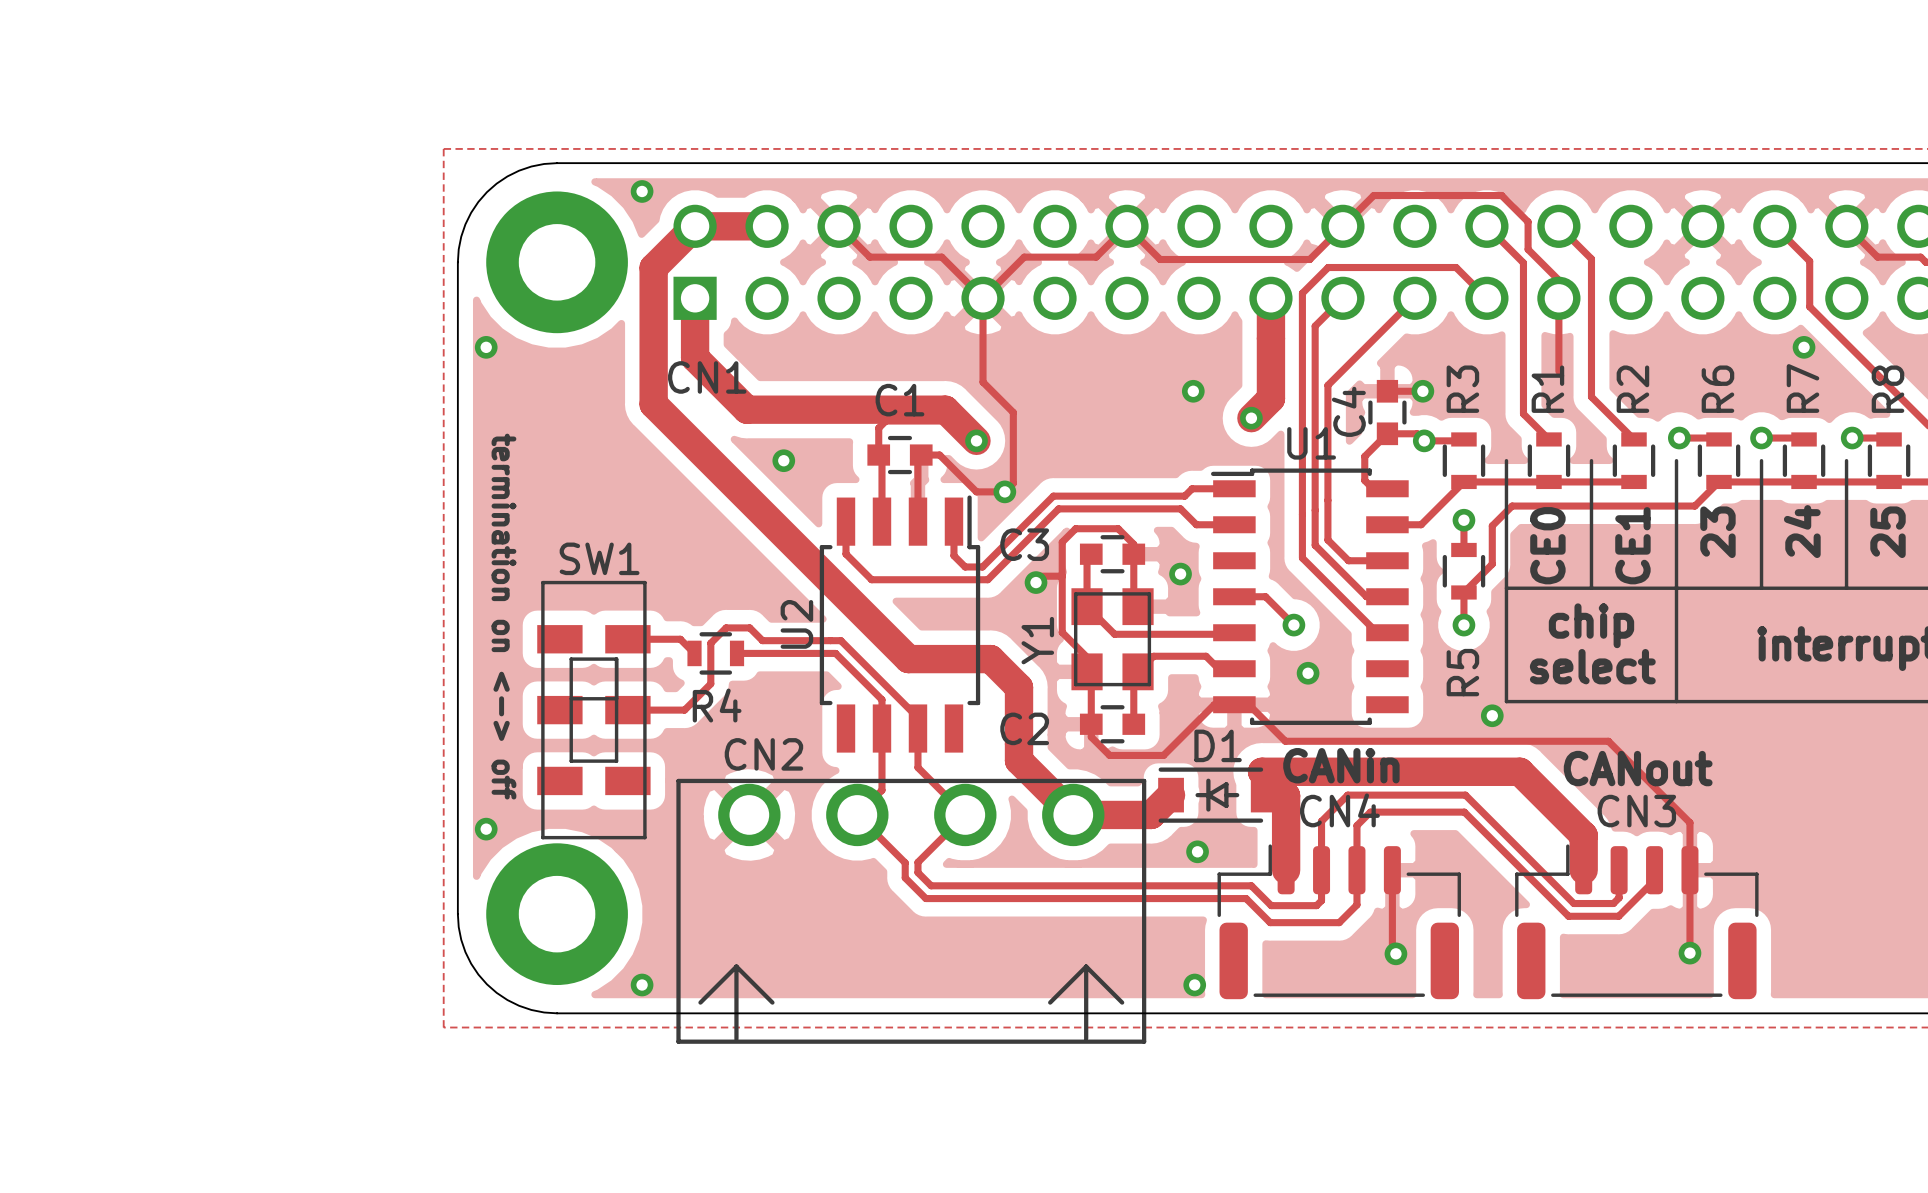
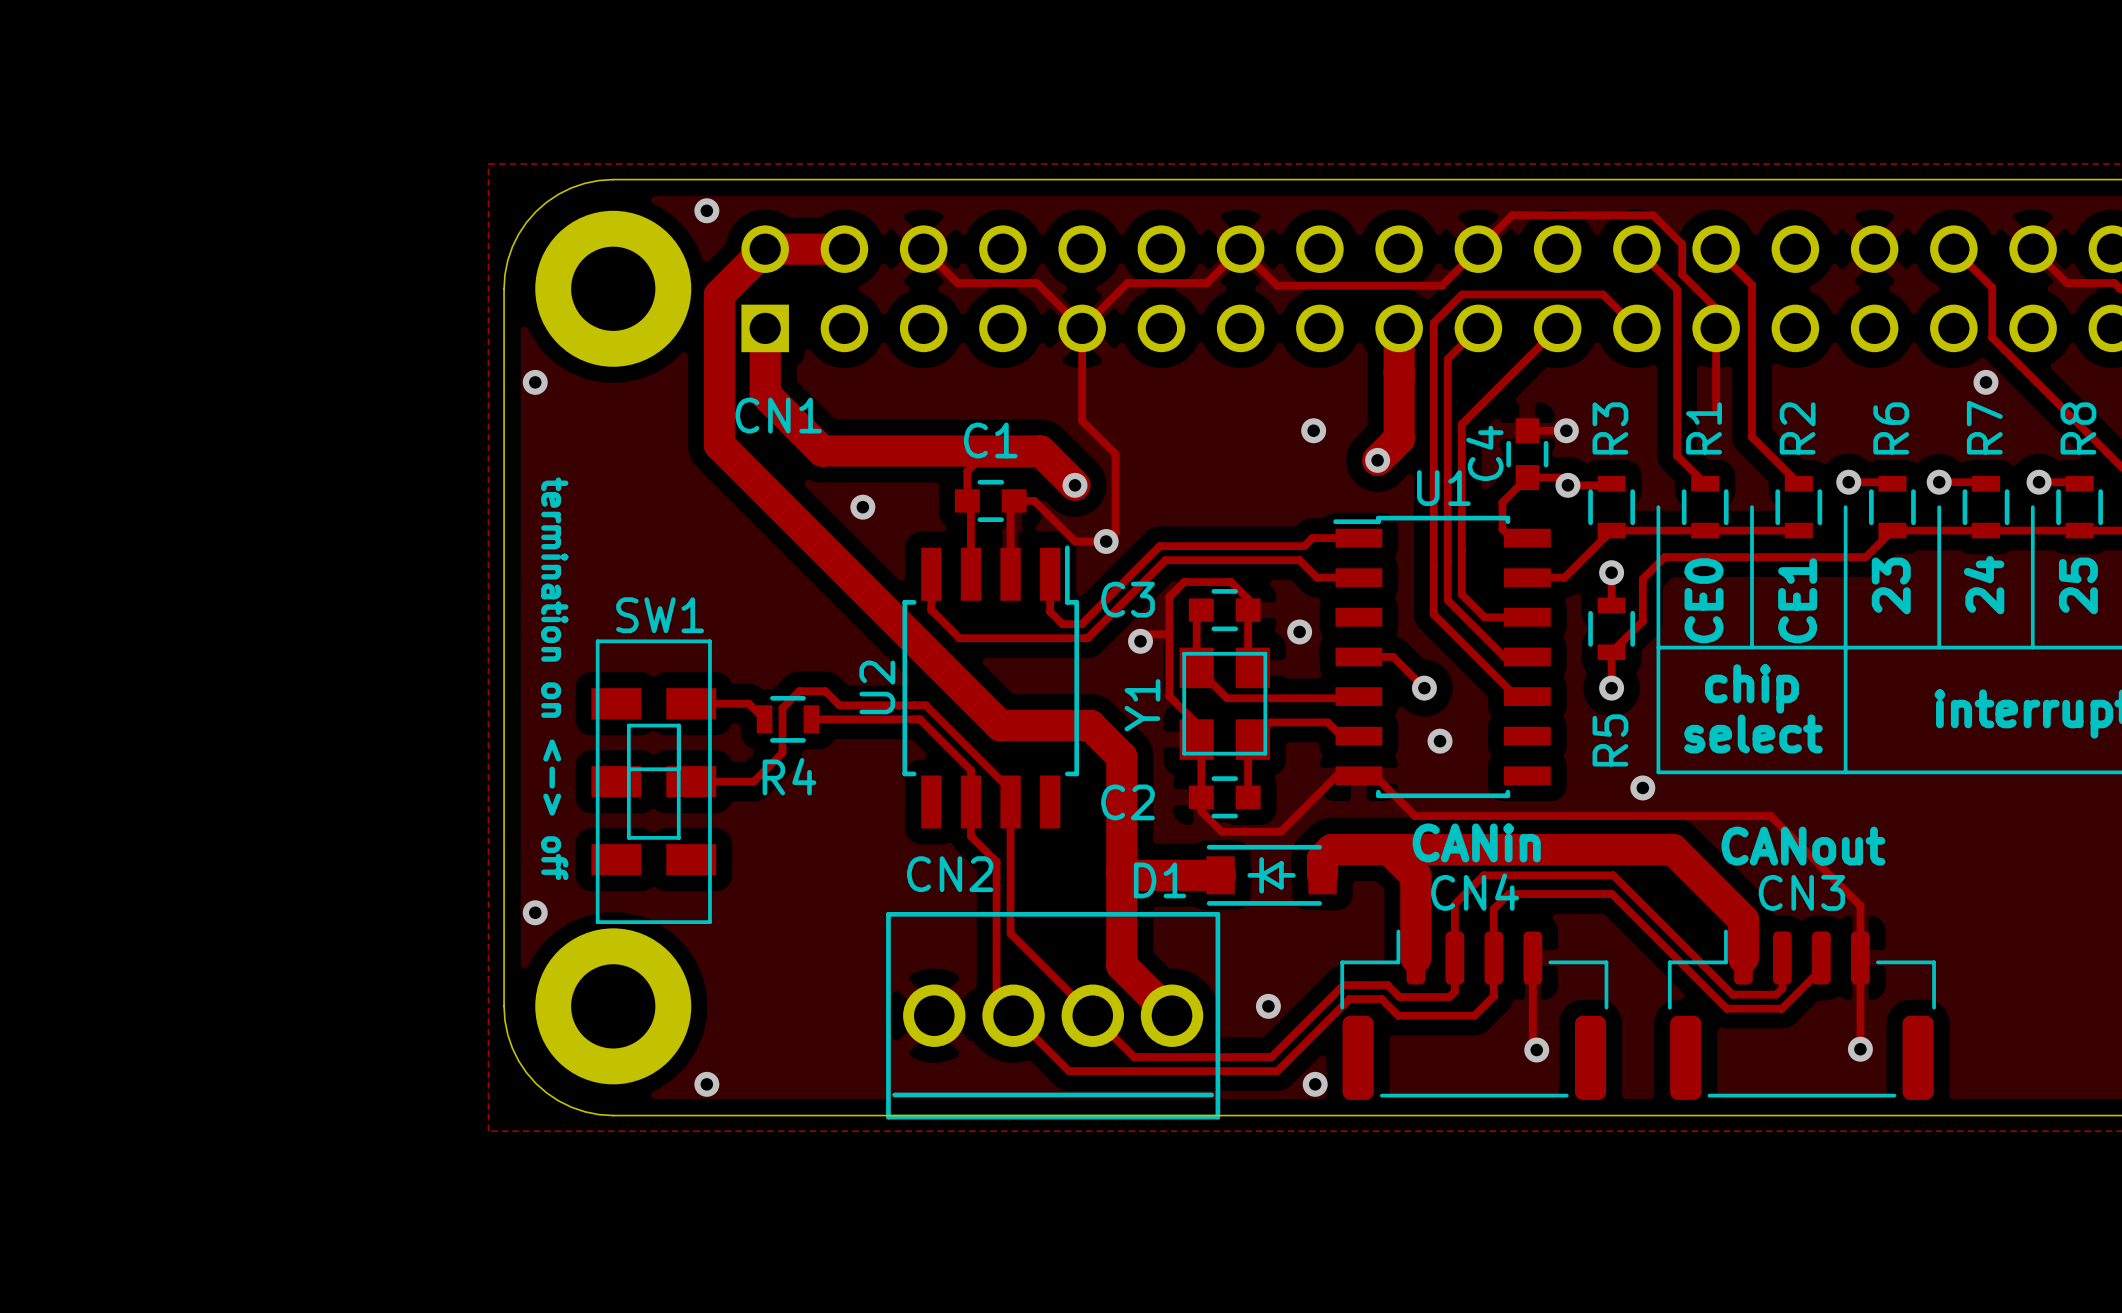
D1 name position: D1 (1218, 745) -> D1 (1159, 880)
CN2 name position: CN2 (763, 754) -> CN2 (950, 874)
track: (881, 759) (881, 790) (857, 814) (905, 862) -> (970, 836) (996, 861) (996, 949)
track: (1019, 760) (1073, 814) (1151, 814) (1171, 795) -> (1121, 837) (1121, 965) (1172, 1015)
track: (917, 767) (965, 814) (917, 862) (917, 872) (931, 885) (1251, 885) (1260, 894) -> (1010, 845) (1010, 933) (1134, 1057) (1271, 1057) (1343, 985) (1387, 985)
track: none -> (1389, 849) (1331, 849) (1322, 858) (1322, 875) (1336, 861) (1401, 861)
CN2 footprint: [676, 778, 1147, 1044] -> [886, 911, 1221, 1120]
track: none -> (1121, 872) (1124, 875) (1220, 875)
D1 position: (1217, 795) -> (1271, 875)
via position: (1197, 851) -> (1268, 1006)
track: (905, 877) (925, 898) (1246, 898) (1255, 907) -> (996, 966) (996, 998) (1068, 1071) (1277, 1071) (1349, 999) (1381, 999)

